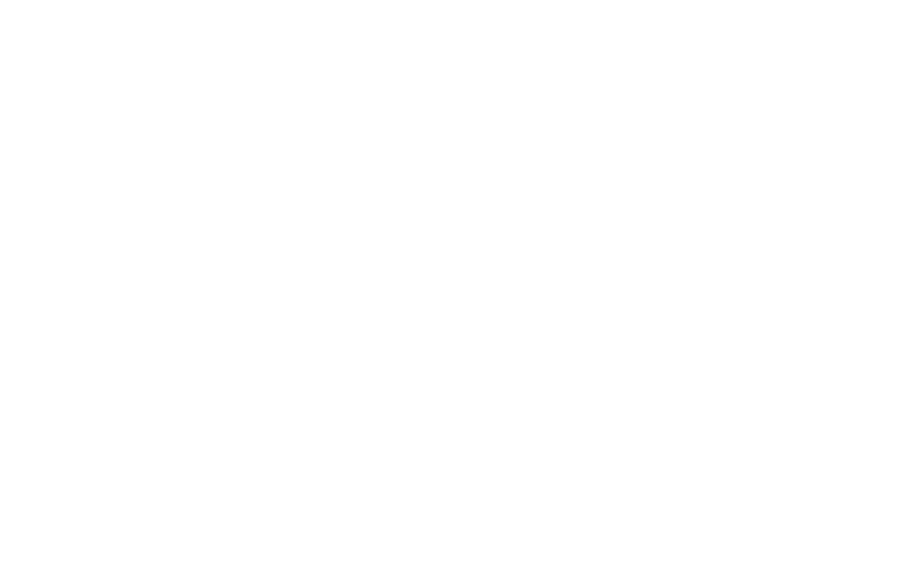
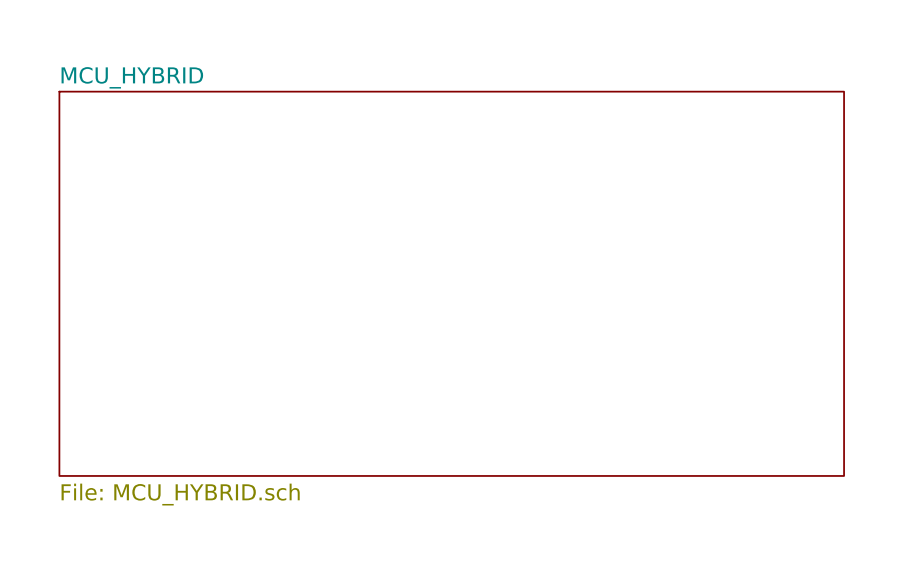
sheet MCU_HYBRID: none -> File: MCU_HYBRID.sch (451, 283)

